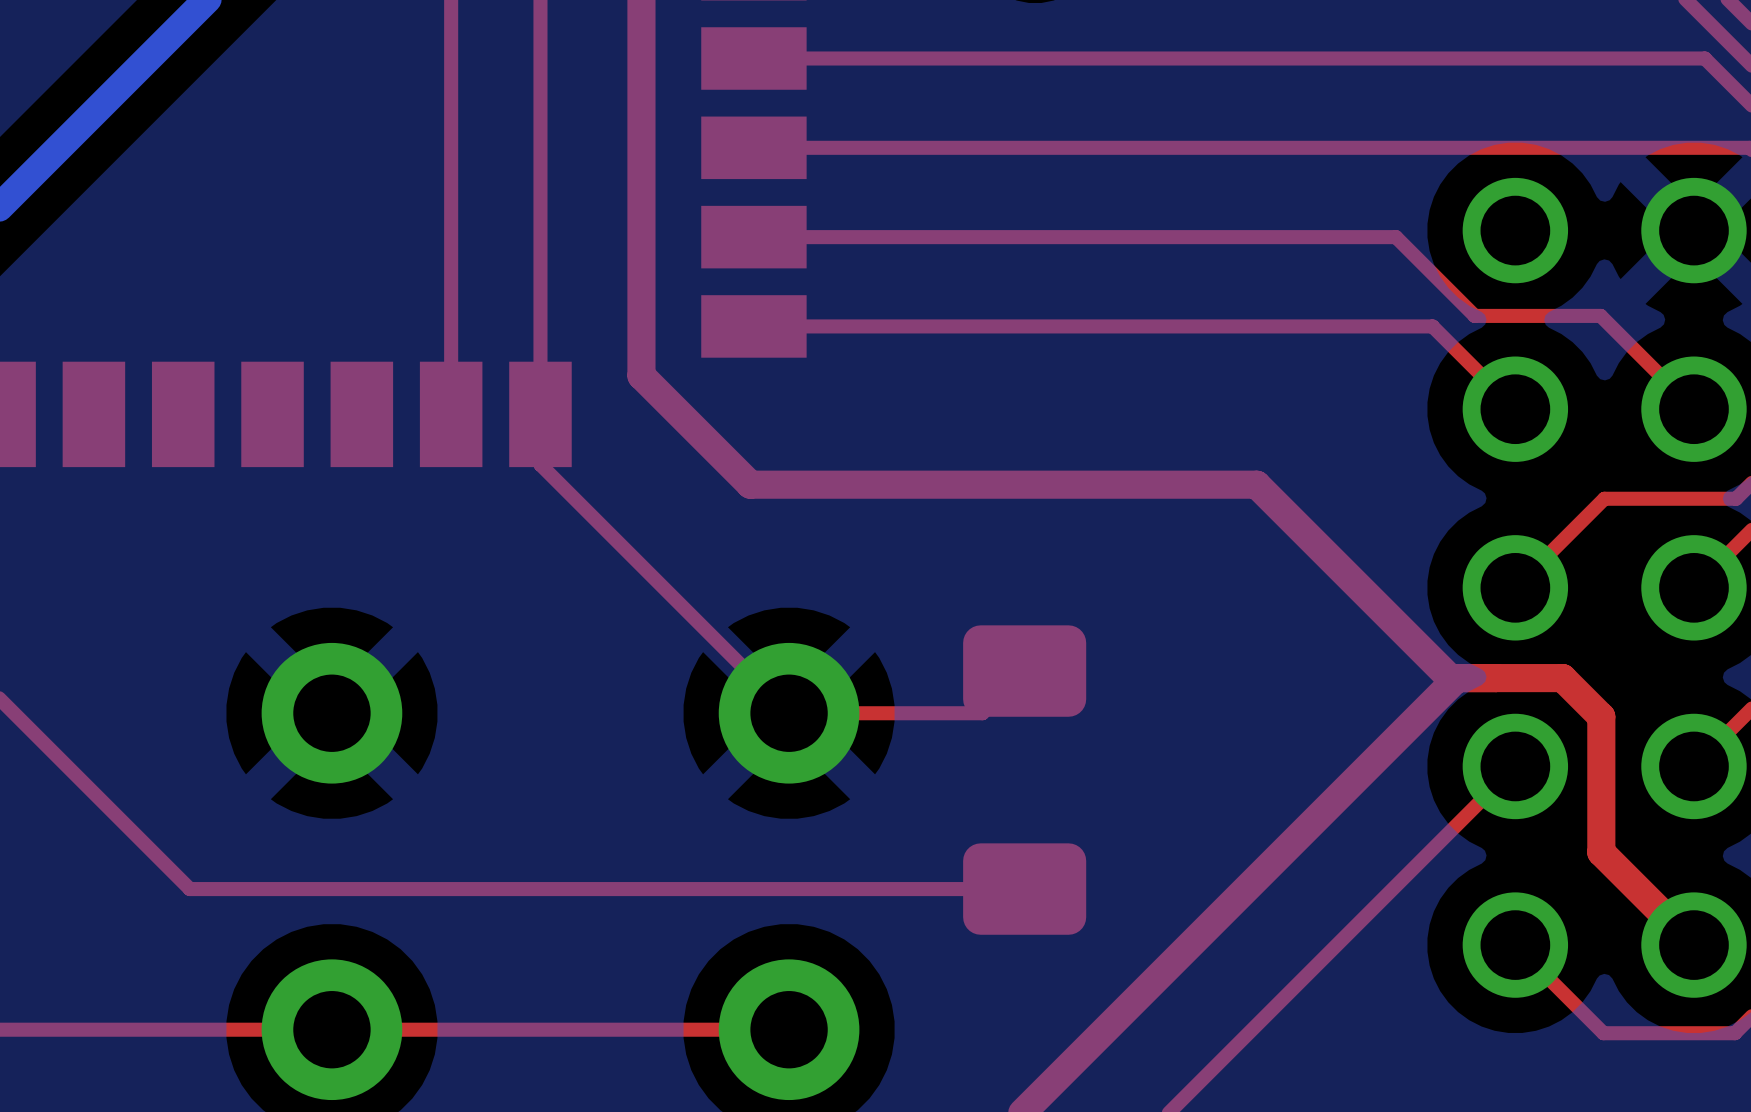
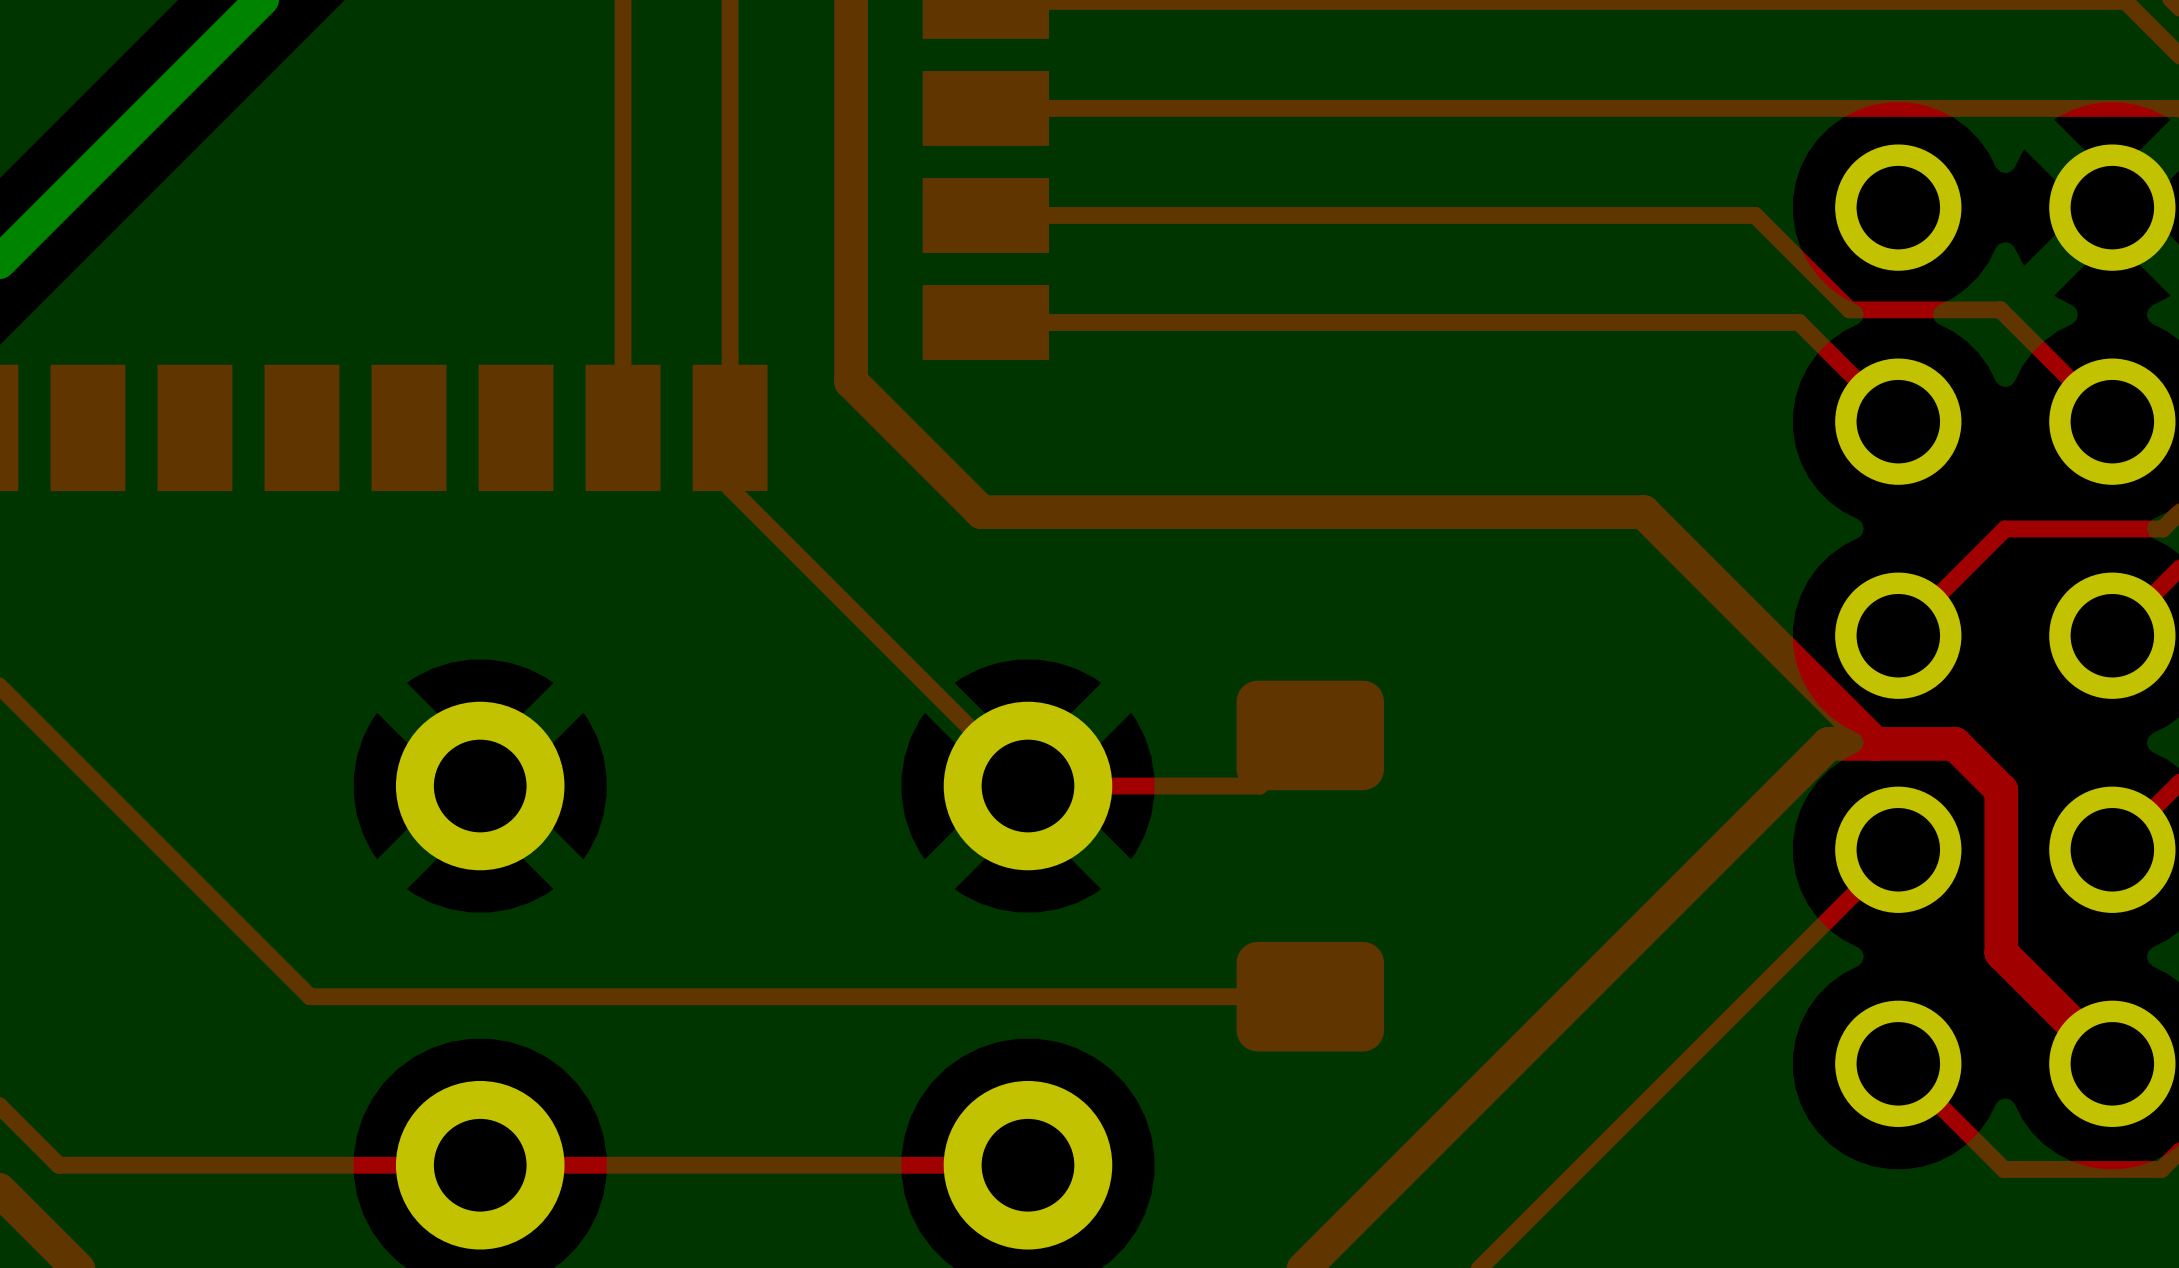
top track: (1256, 484) (1450, 678) (1457, 678) -> (1588, 512) (1643, 512) (1875, 743)

